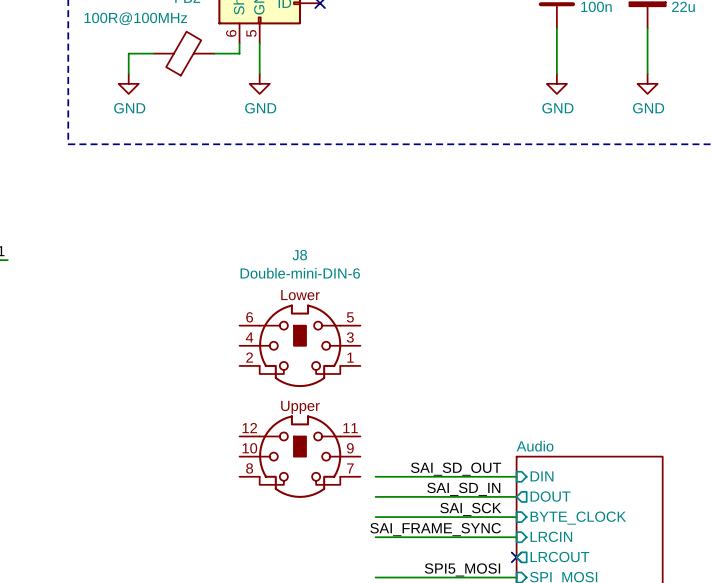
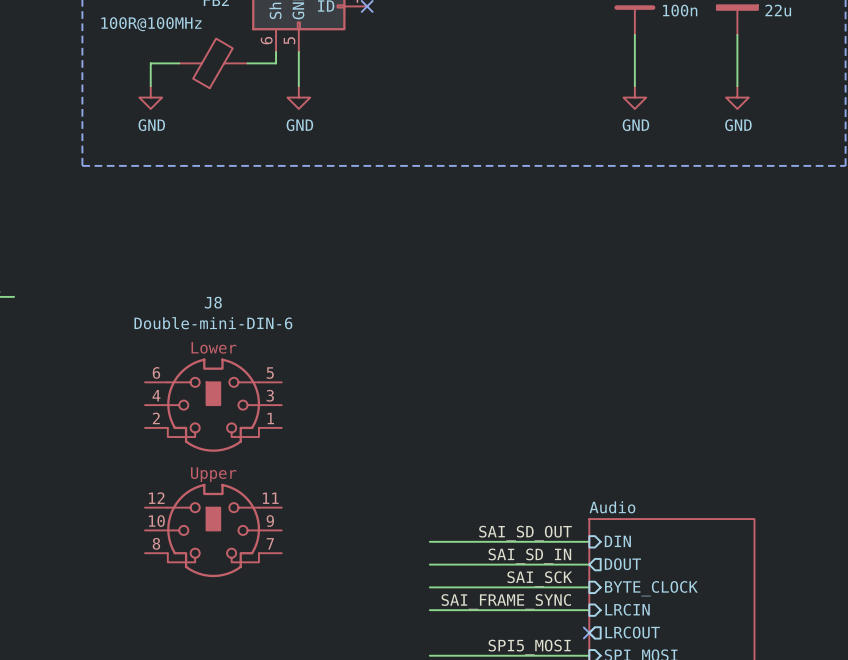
J8 position: (299, 401) -> (213, 467)

